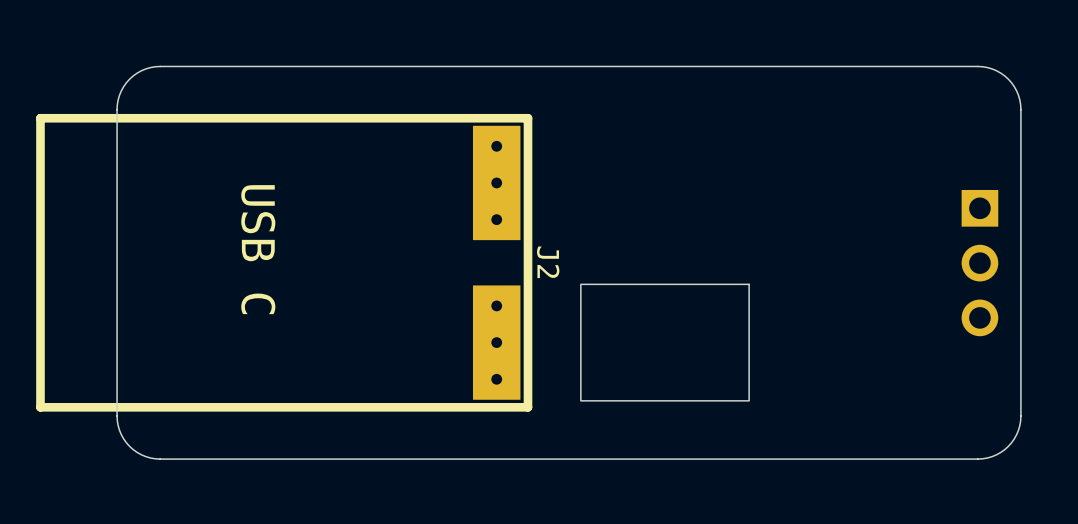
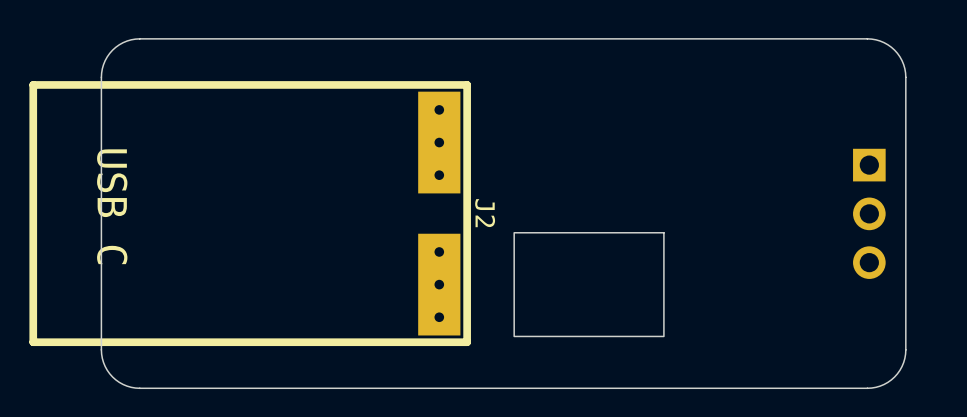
J2 text position: USB C (258, 249) -> USB C (112, 206)

